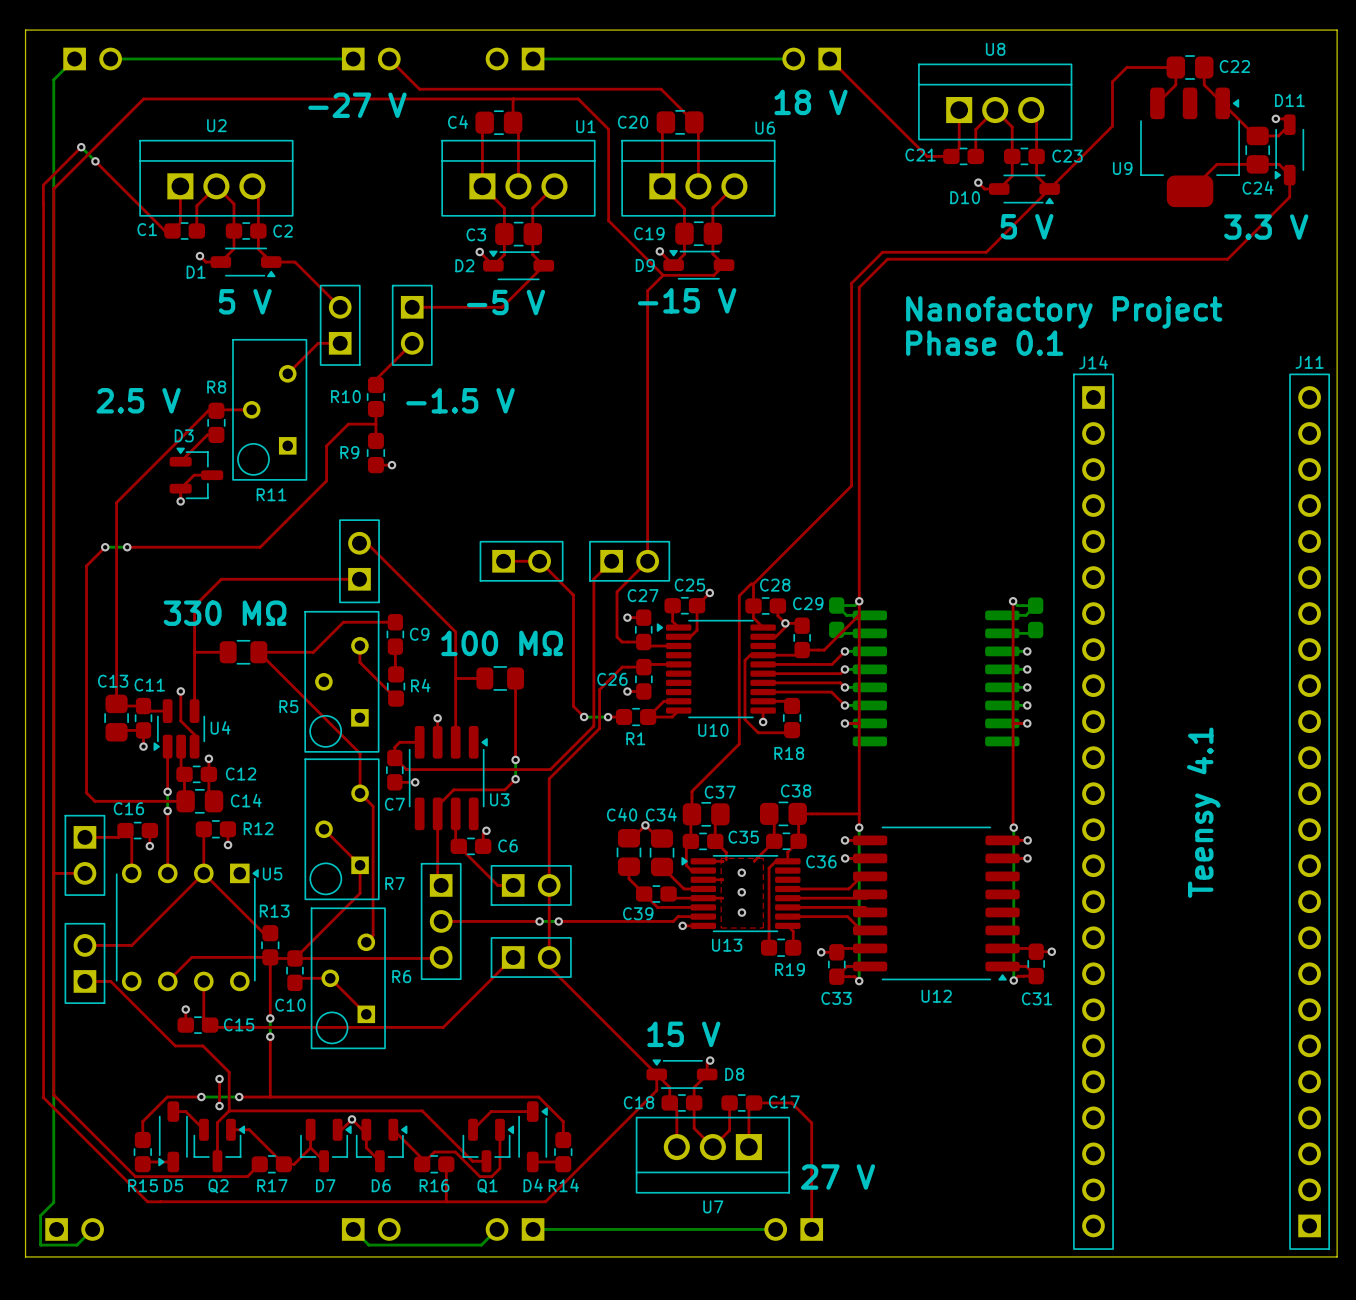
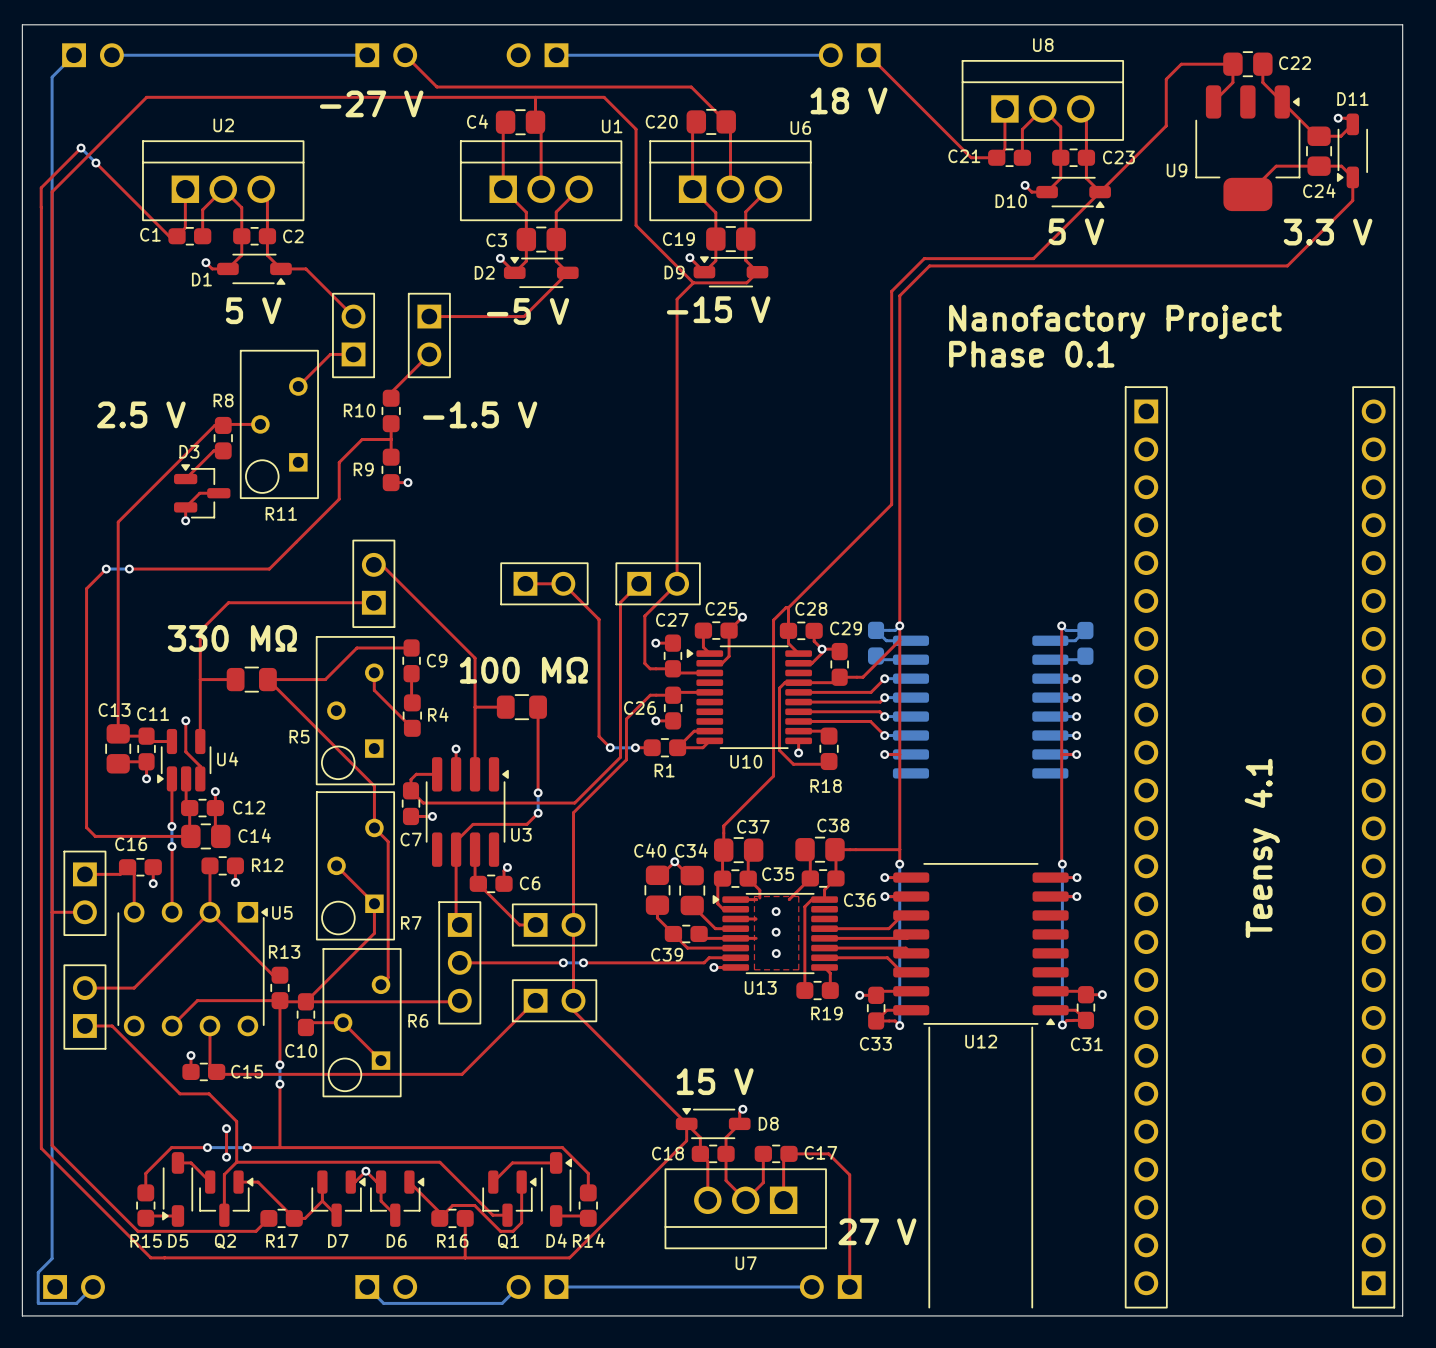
J14 name: J14 (1093, 362) -> none
J11 name: J11 (1309, 362) -> none
line: none -> (929, 1027) (929, 1307)
line: none -> (1032, 1027) (1032, 1307)

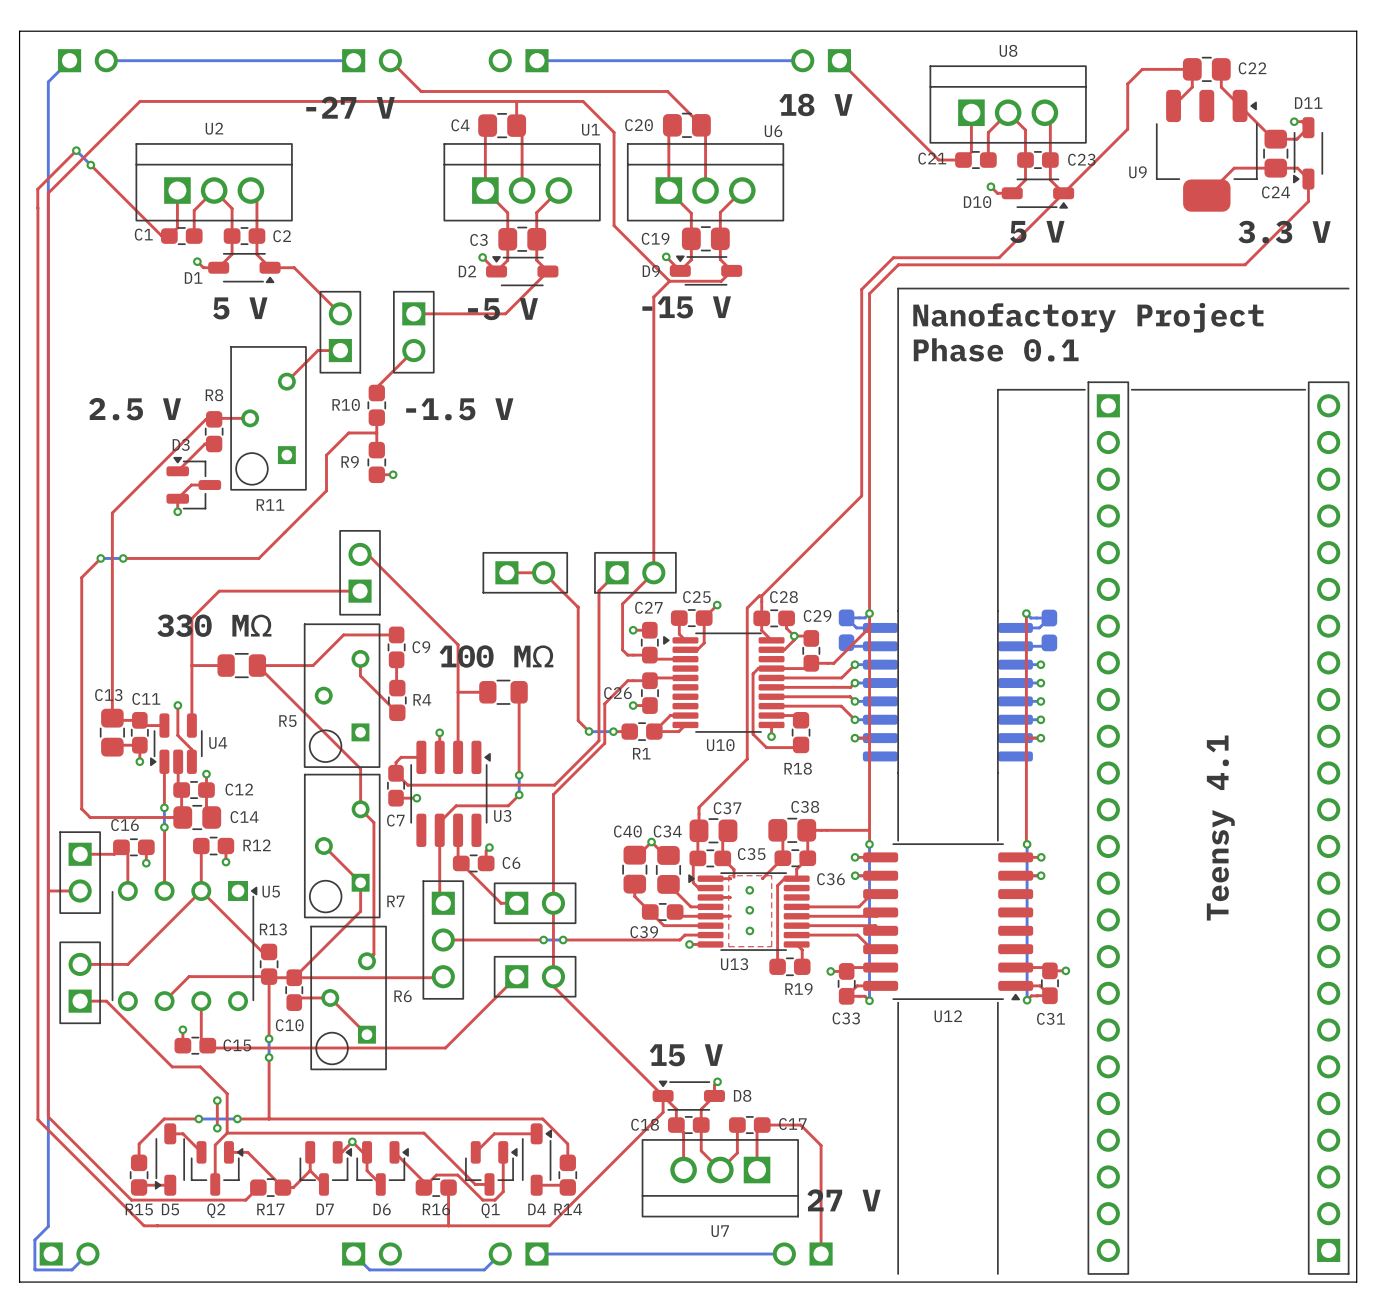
line: none -> (1348, 288) (898, 288) (898, 840)
line: none -> (1084, 389) (997, 389) (997, 840)
line: none -> (1131, 389) (1305, 389)

